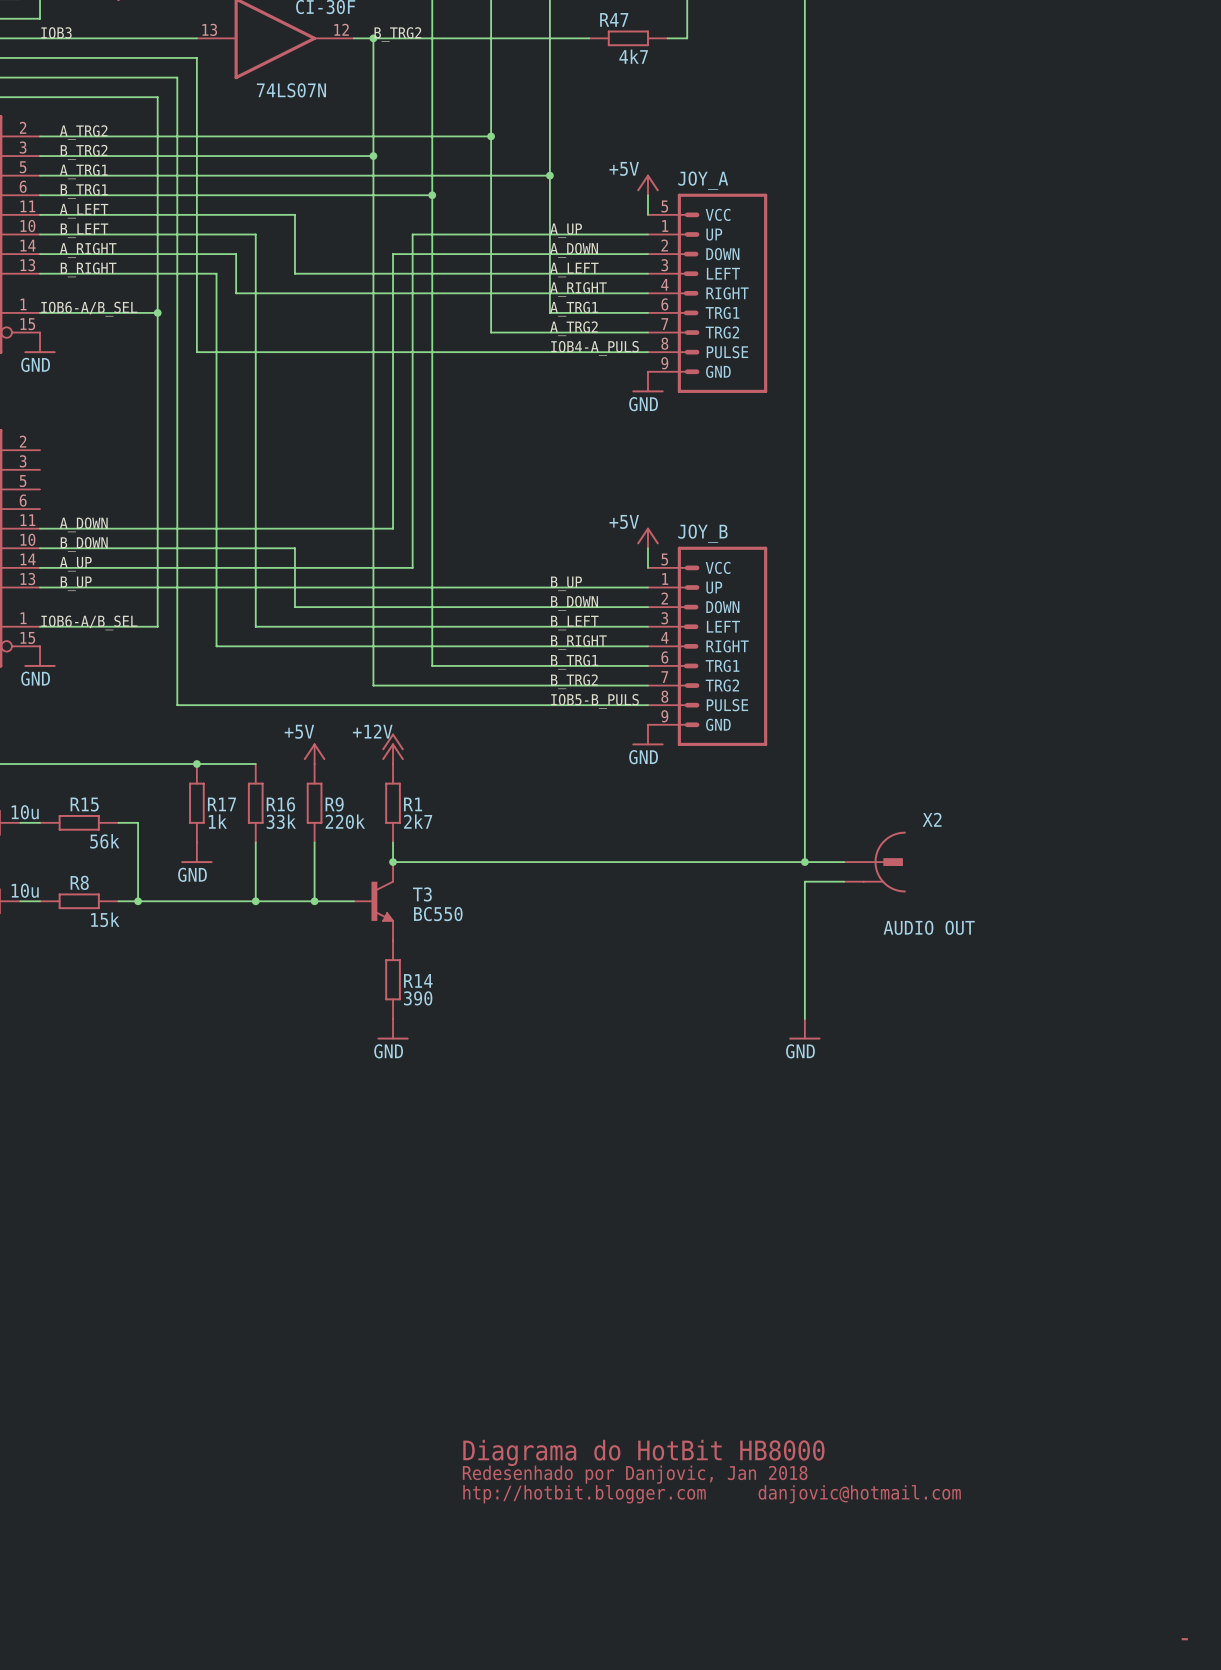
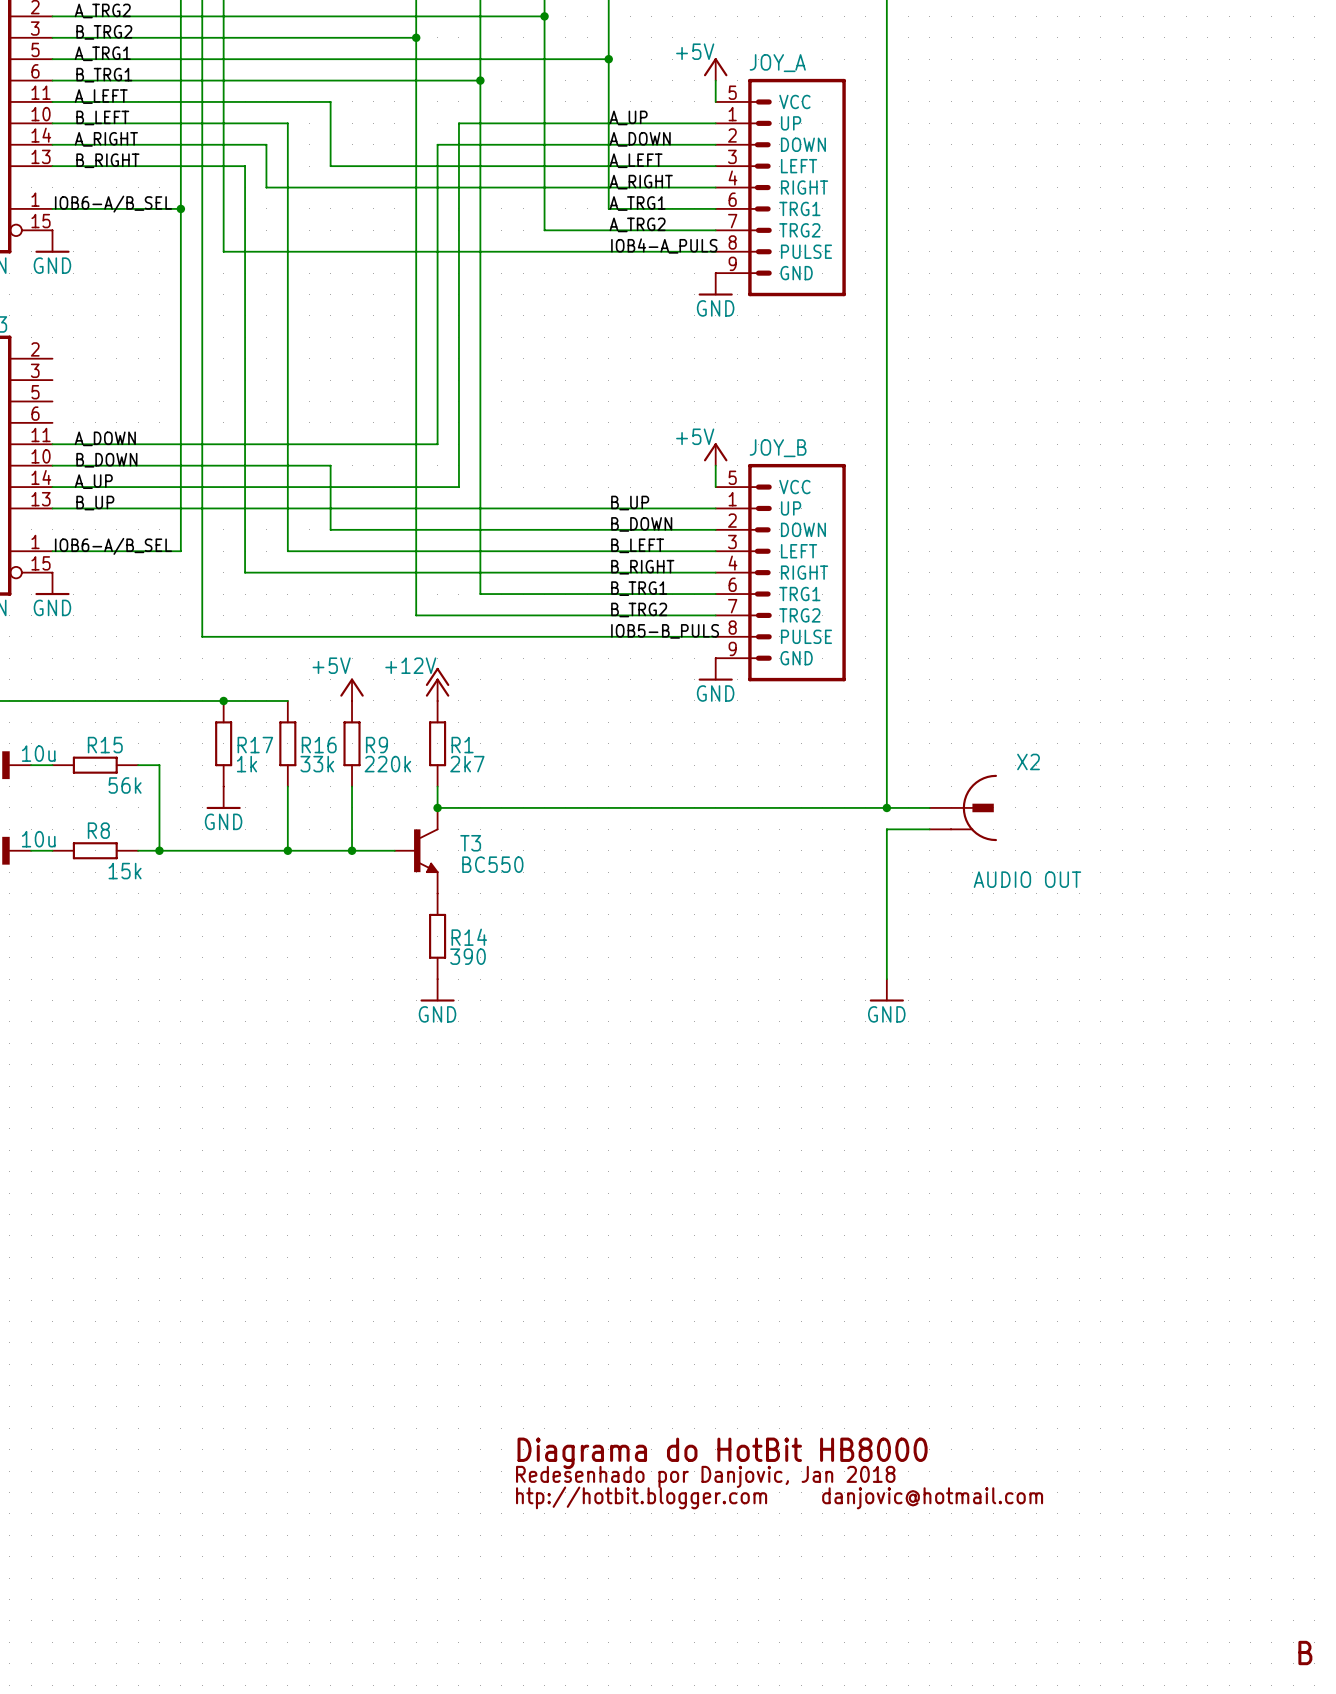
text: - (1184, 1639) -> B (1305, 1653)

